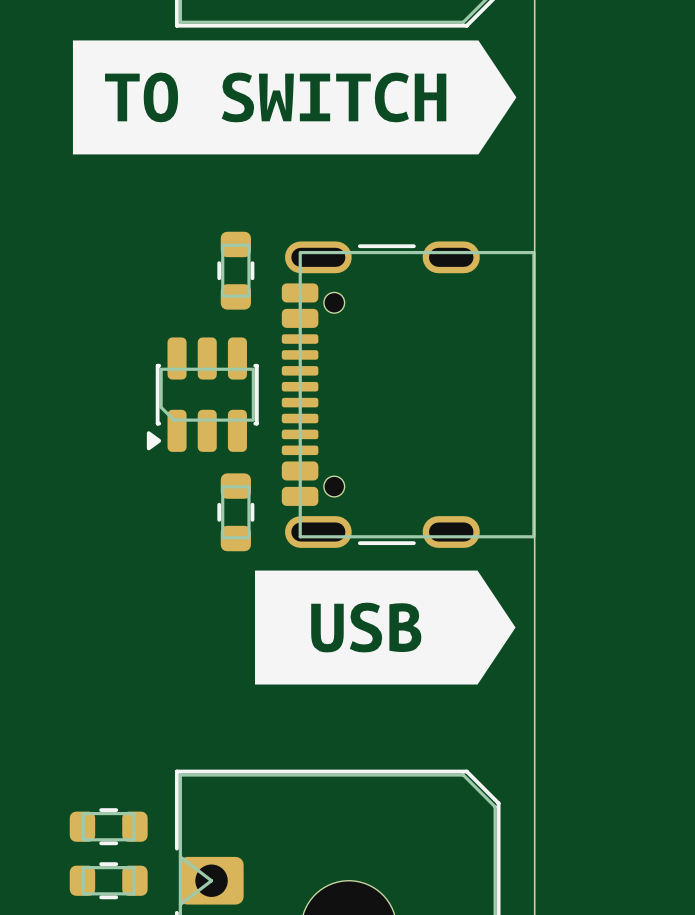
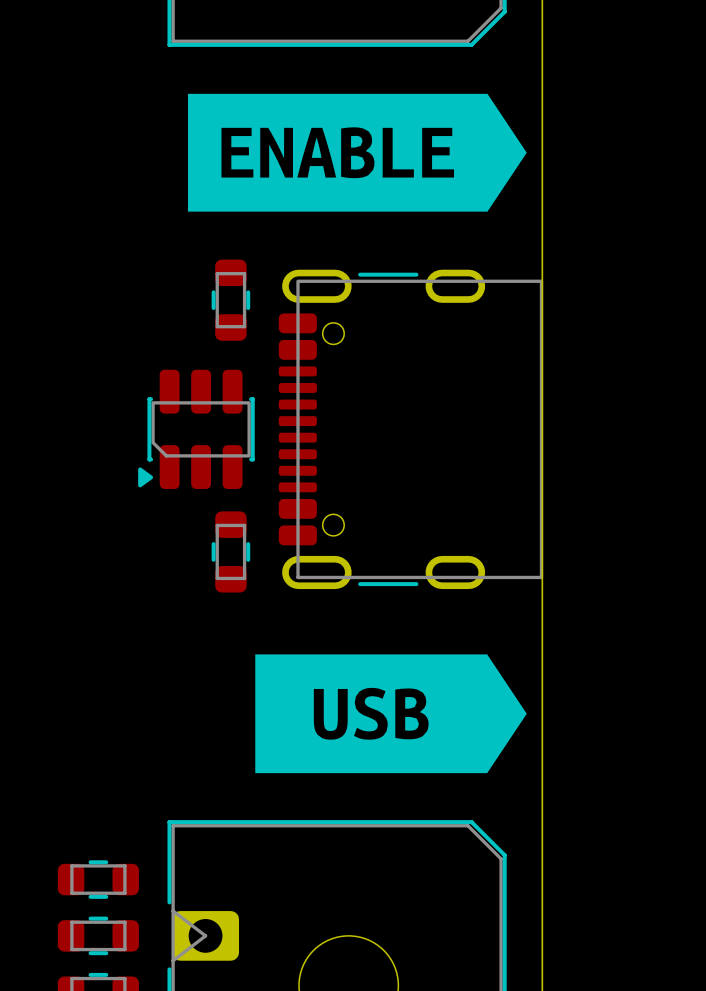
drawing: [72, 40, 517, 155] -> none
drawing: none -> [188, 93, 527, 212]
drawing position: (385, 627) -> (391, 713)

